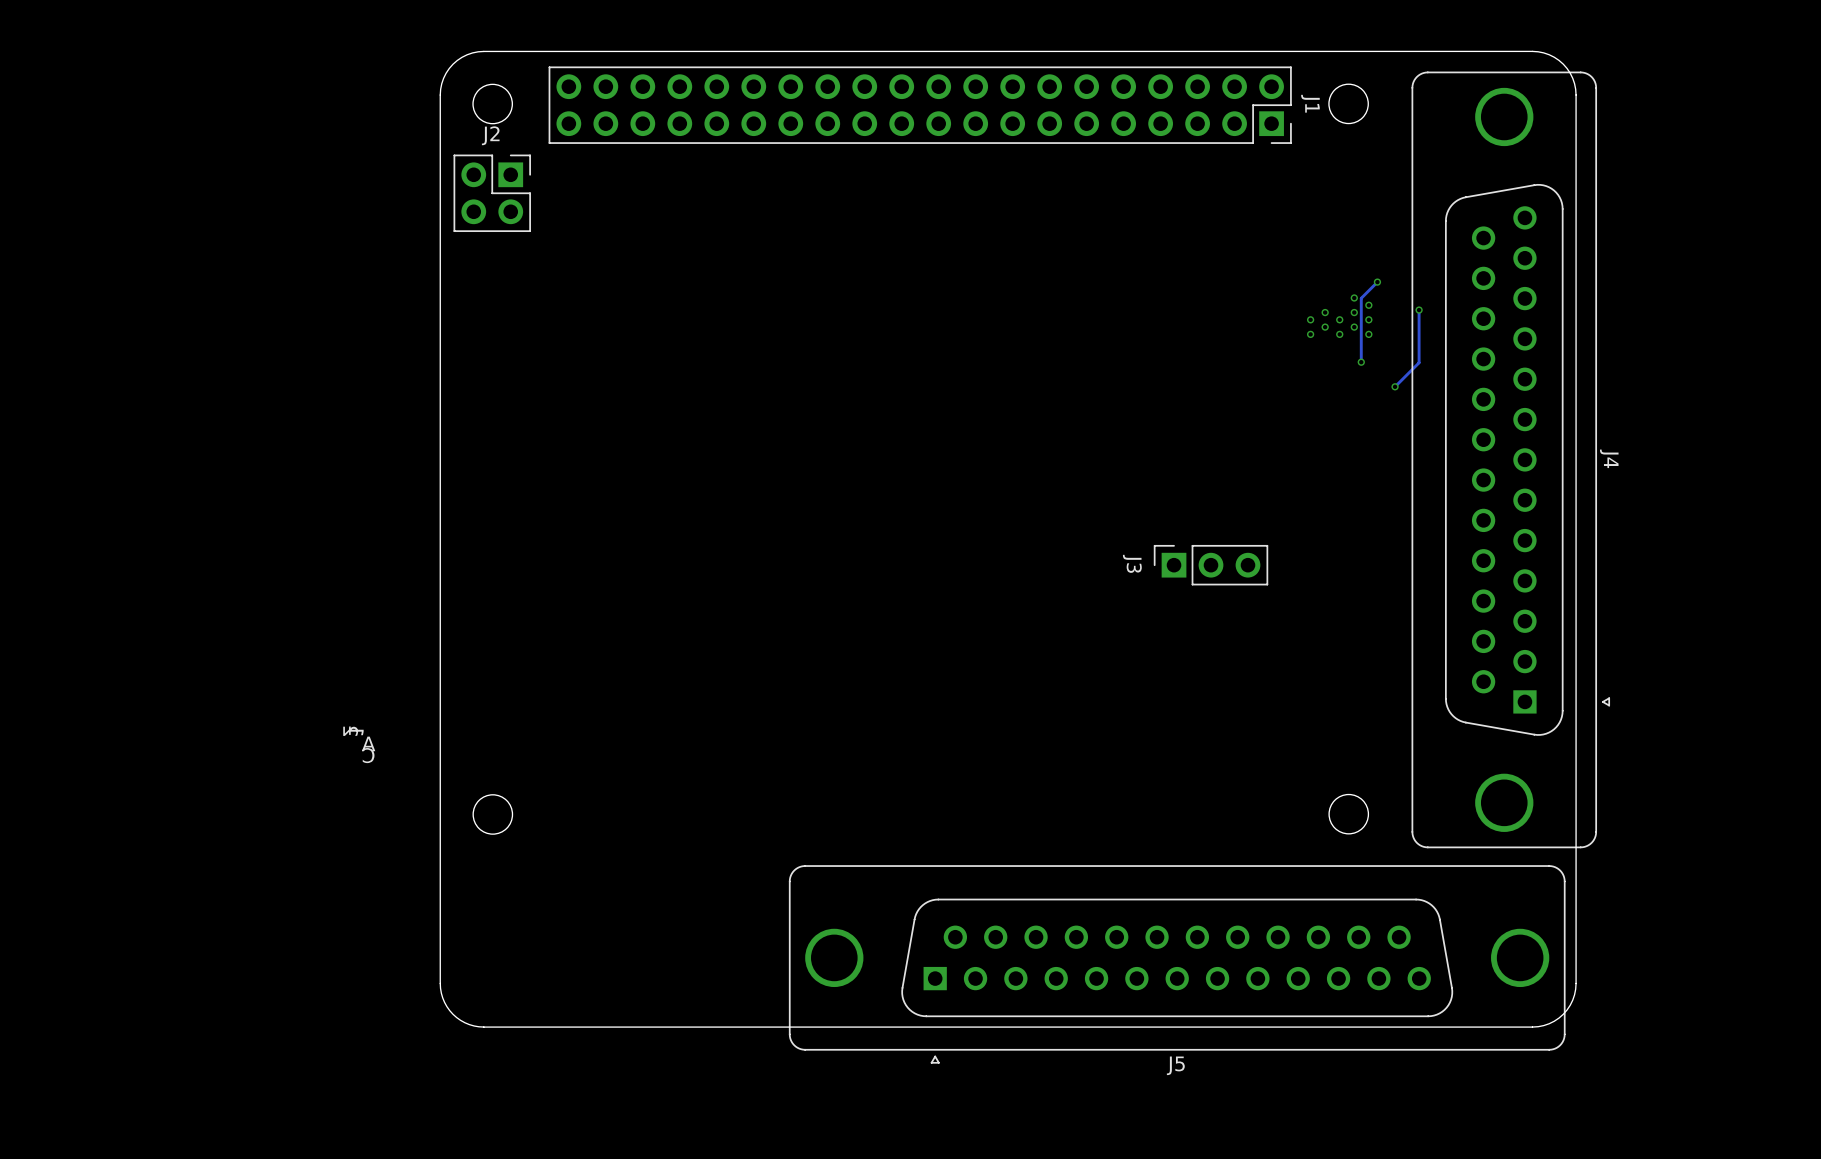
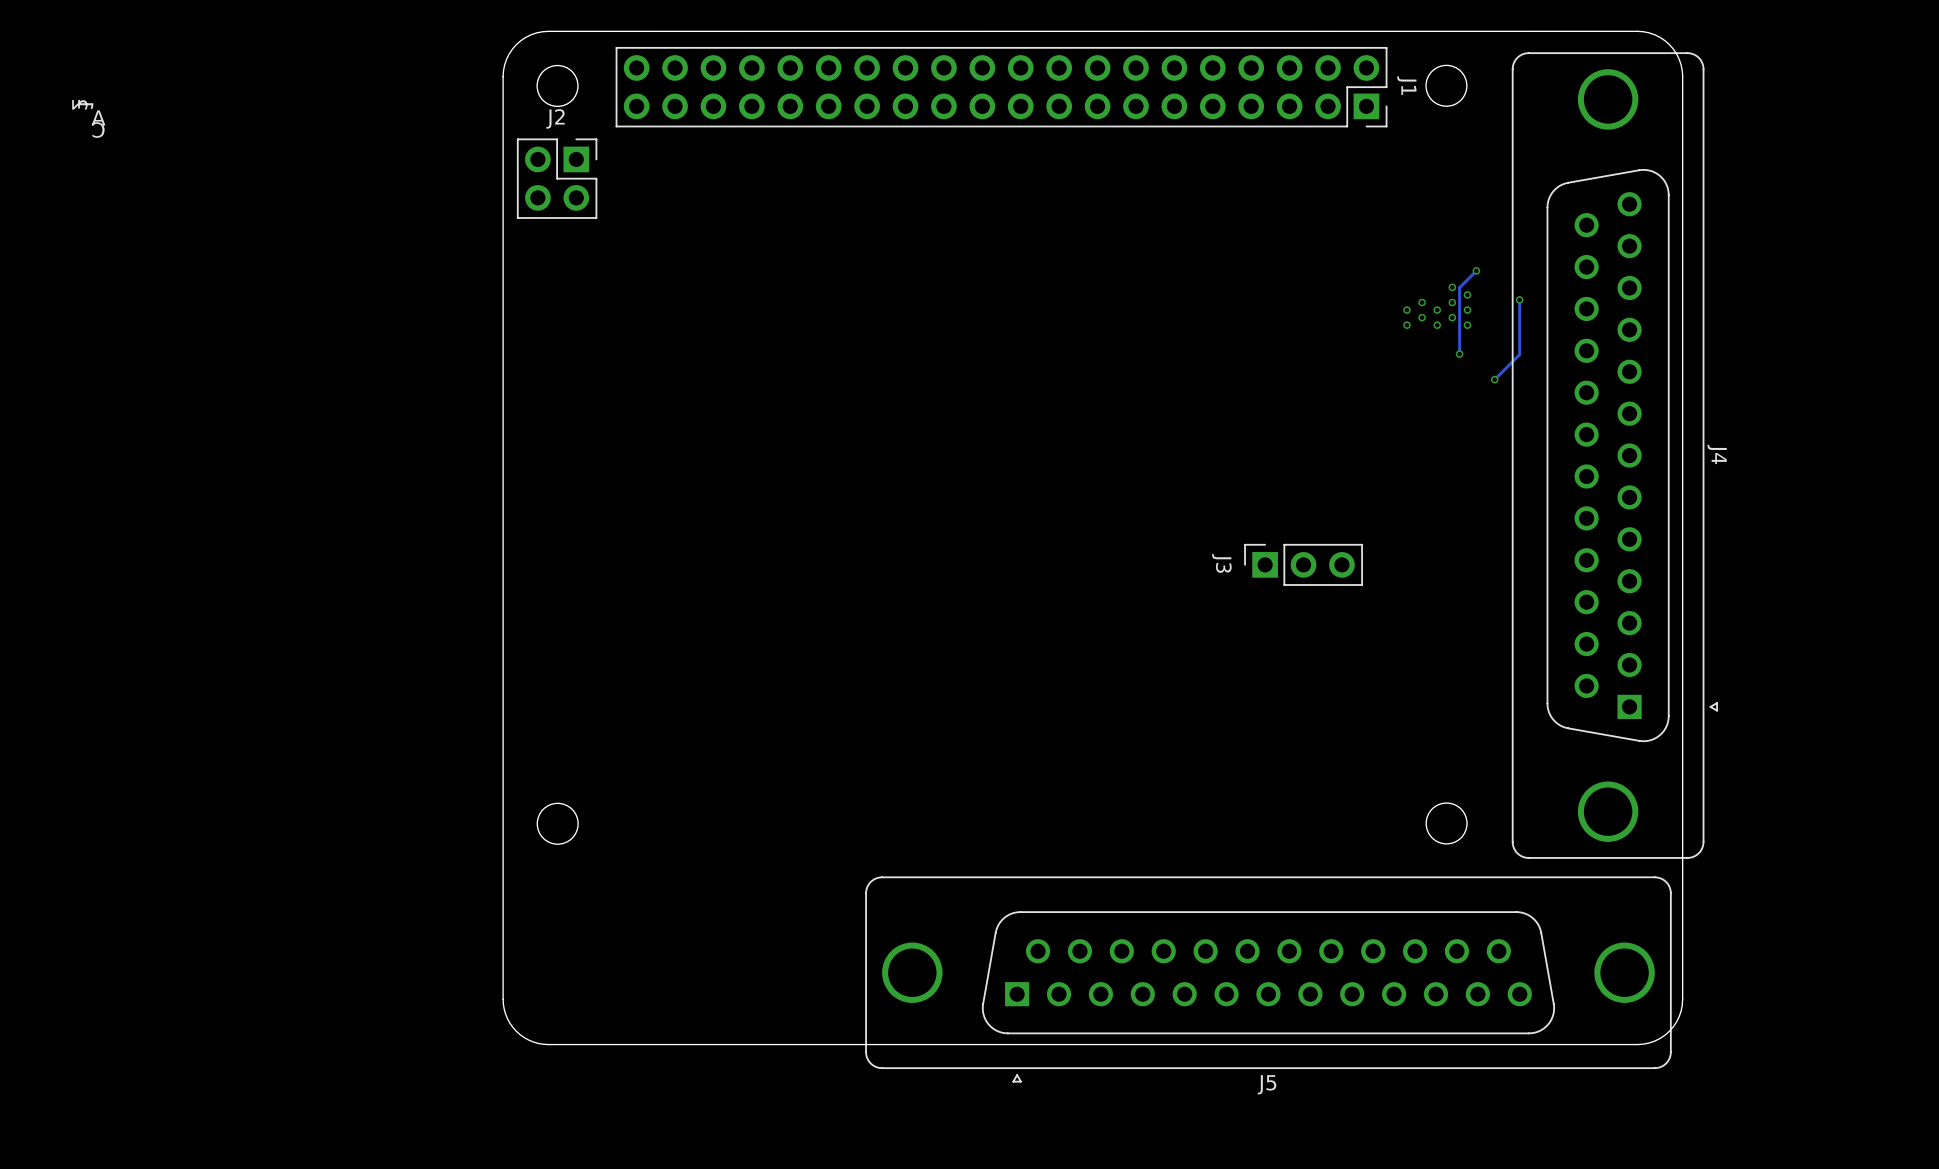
part: none -> (88, 118)
part: (359, 744) -> none

